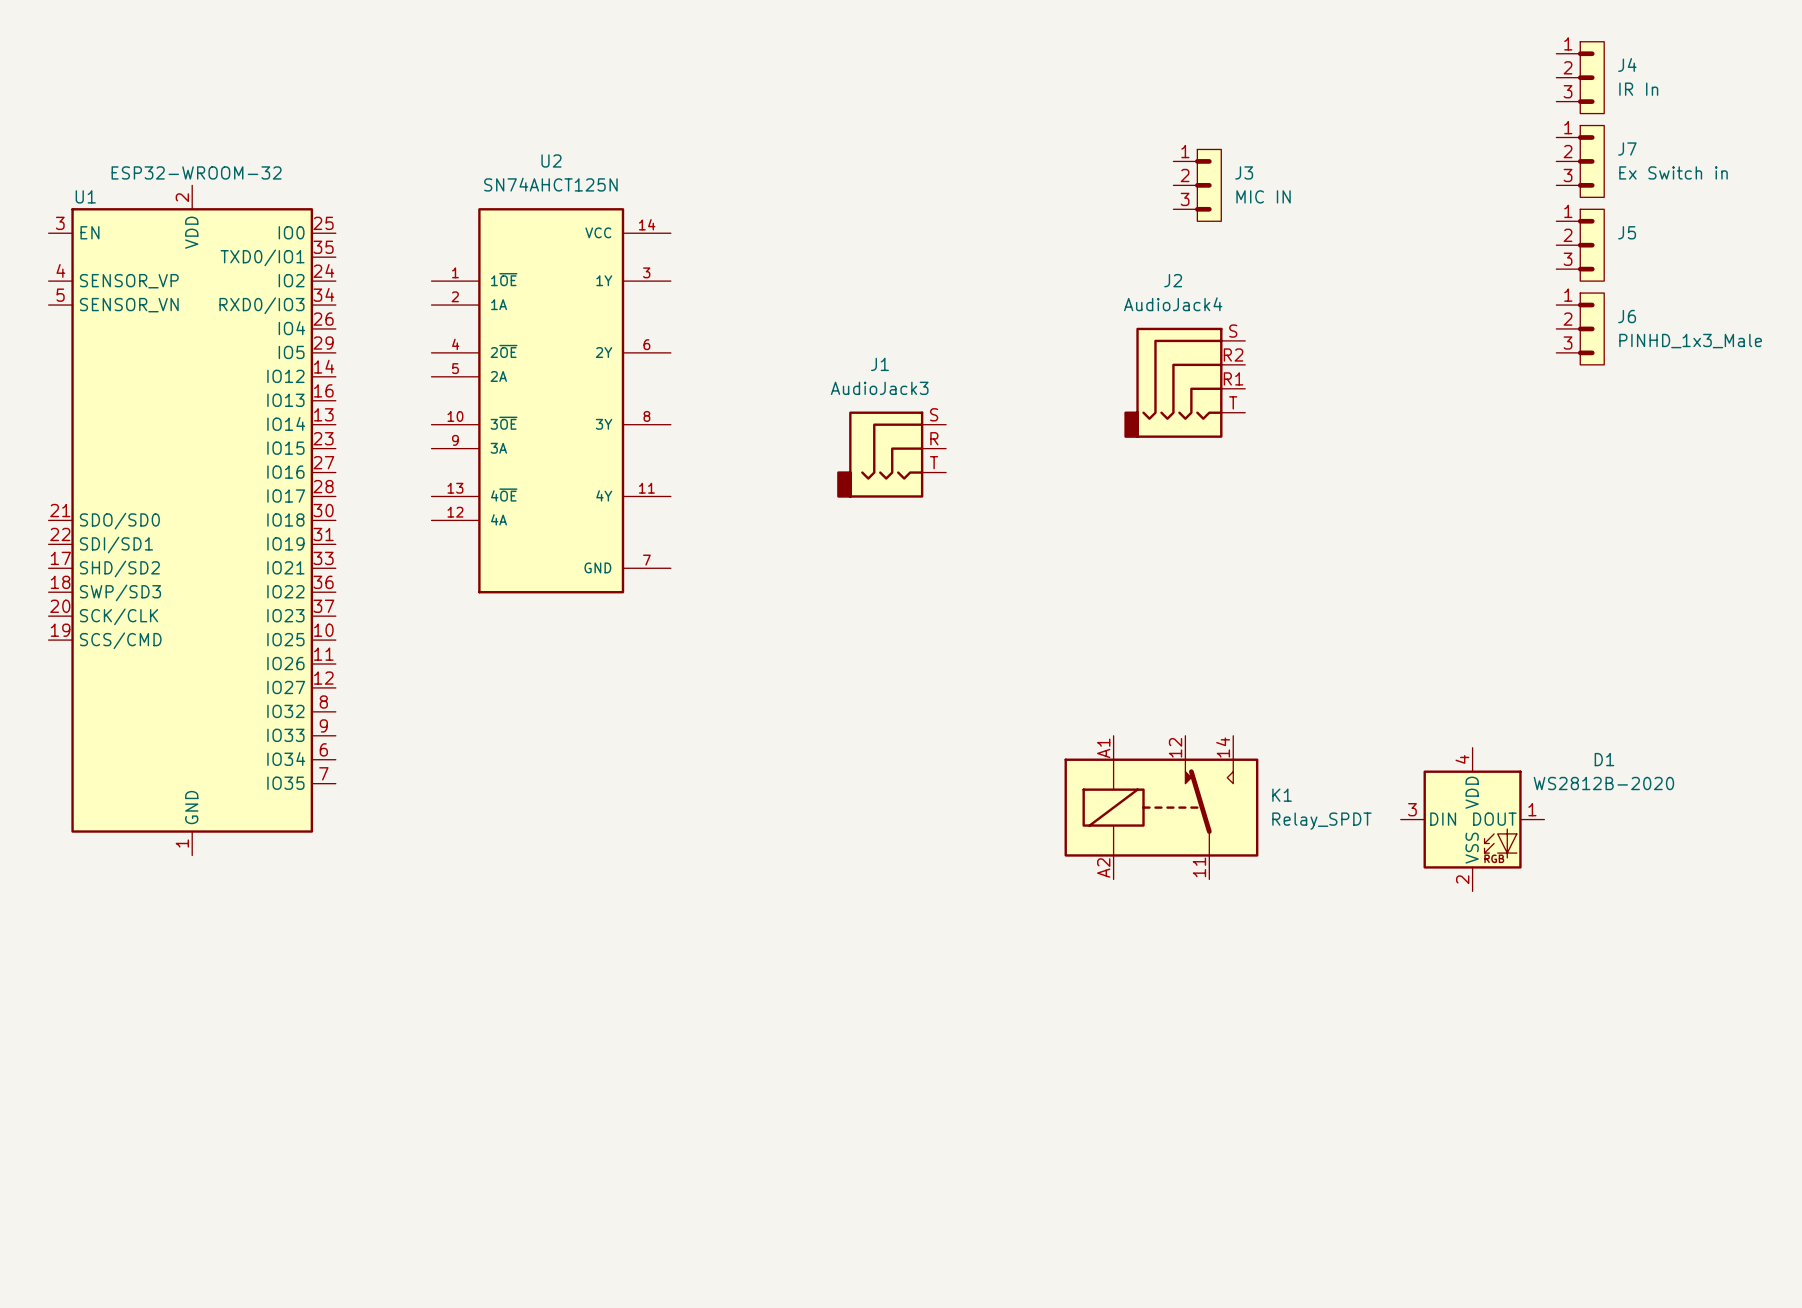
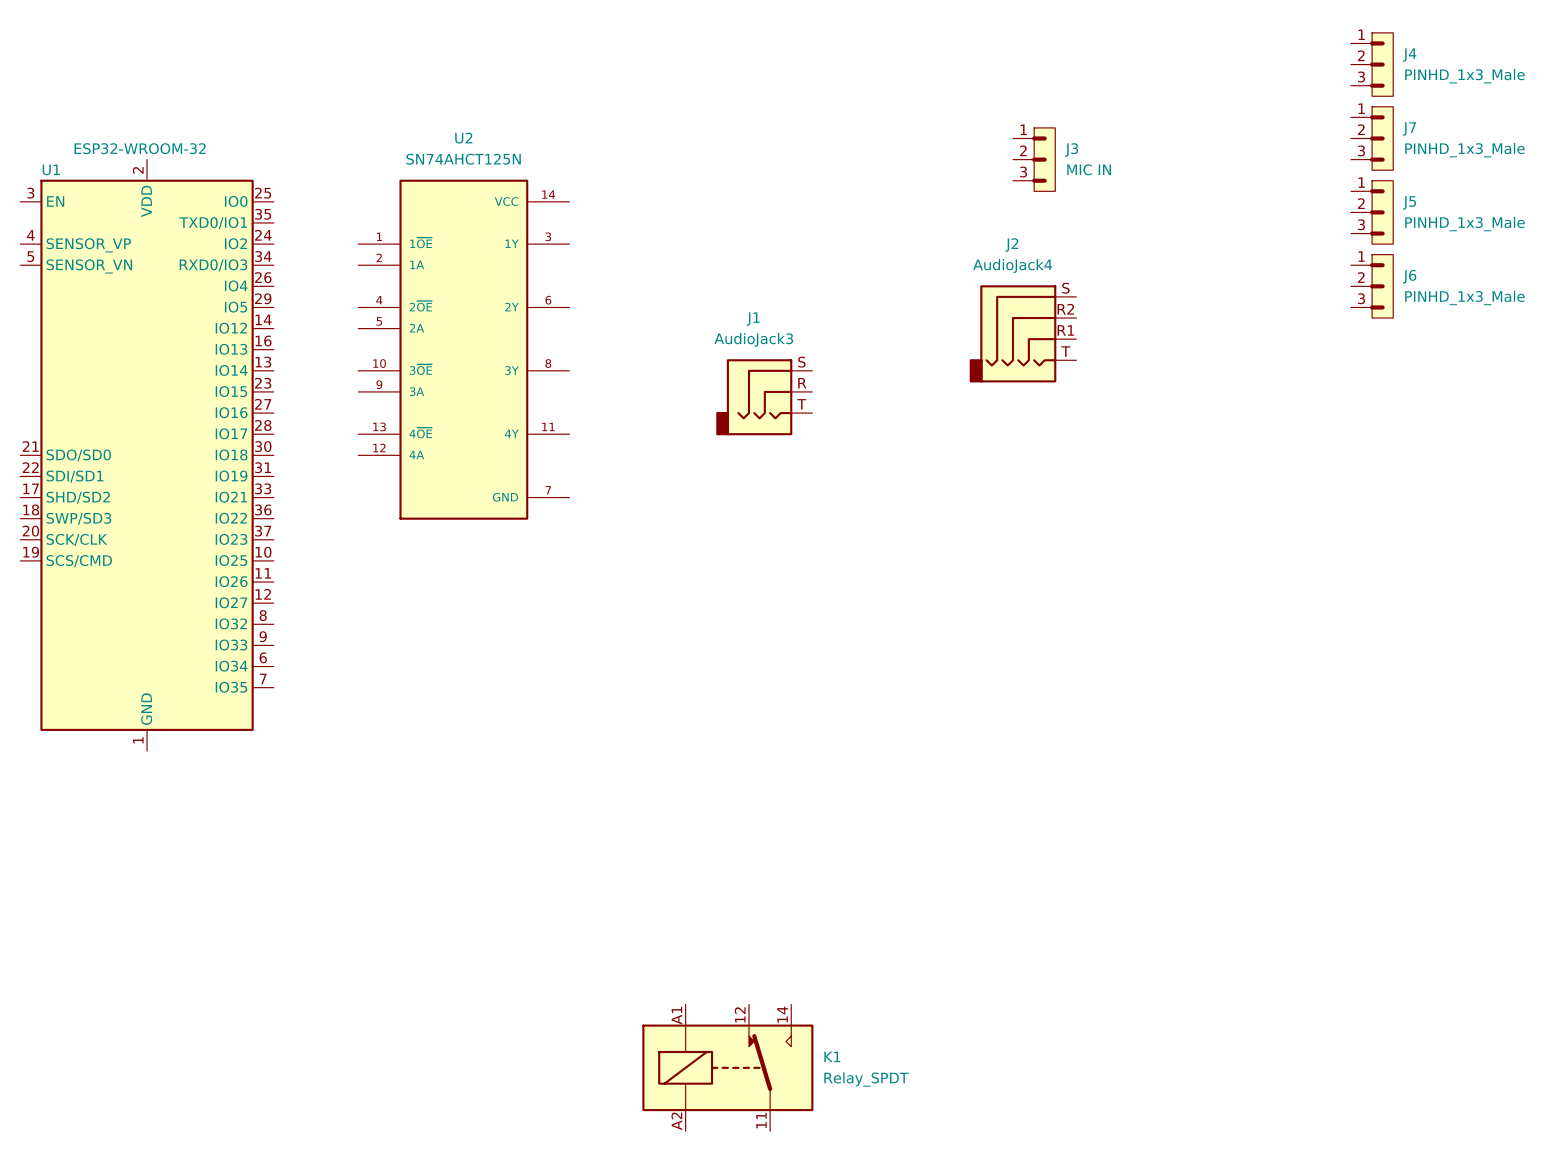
J4 value: IR In (1638, 89) -> PINHD_1x3_Male (1464, 76)
J7 value: Ex Switch in (1673, 172) -> PINHD_1x3_Male (1464, 150)
J5 value: none -> PINHD_1x3_Male (1464, 224)
K1 position: (1161, 807) -> (727, 1067)
D1: WS2812B-2020 (1472, 819) -> none

